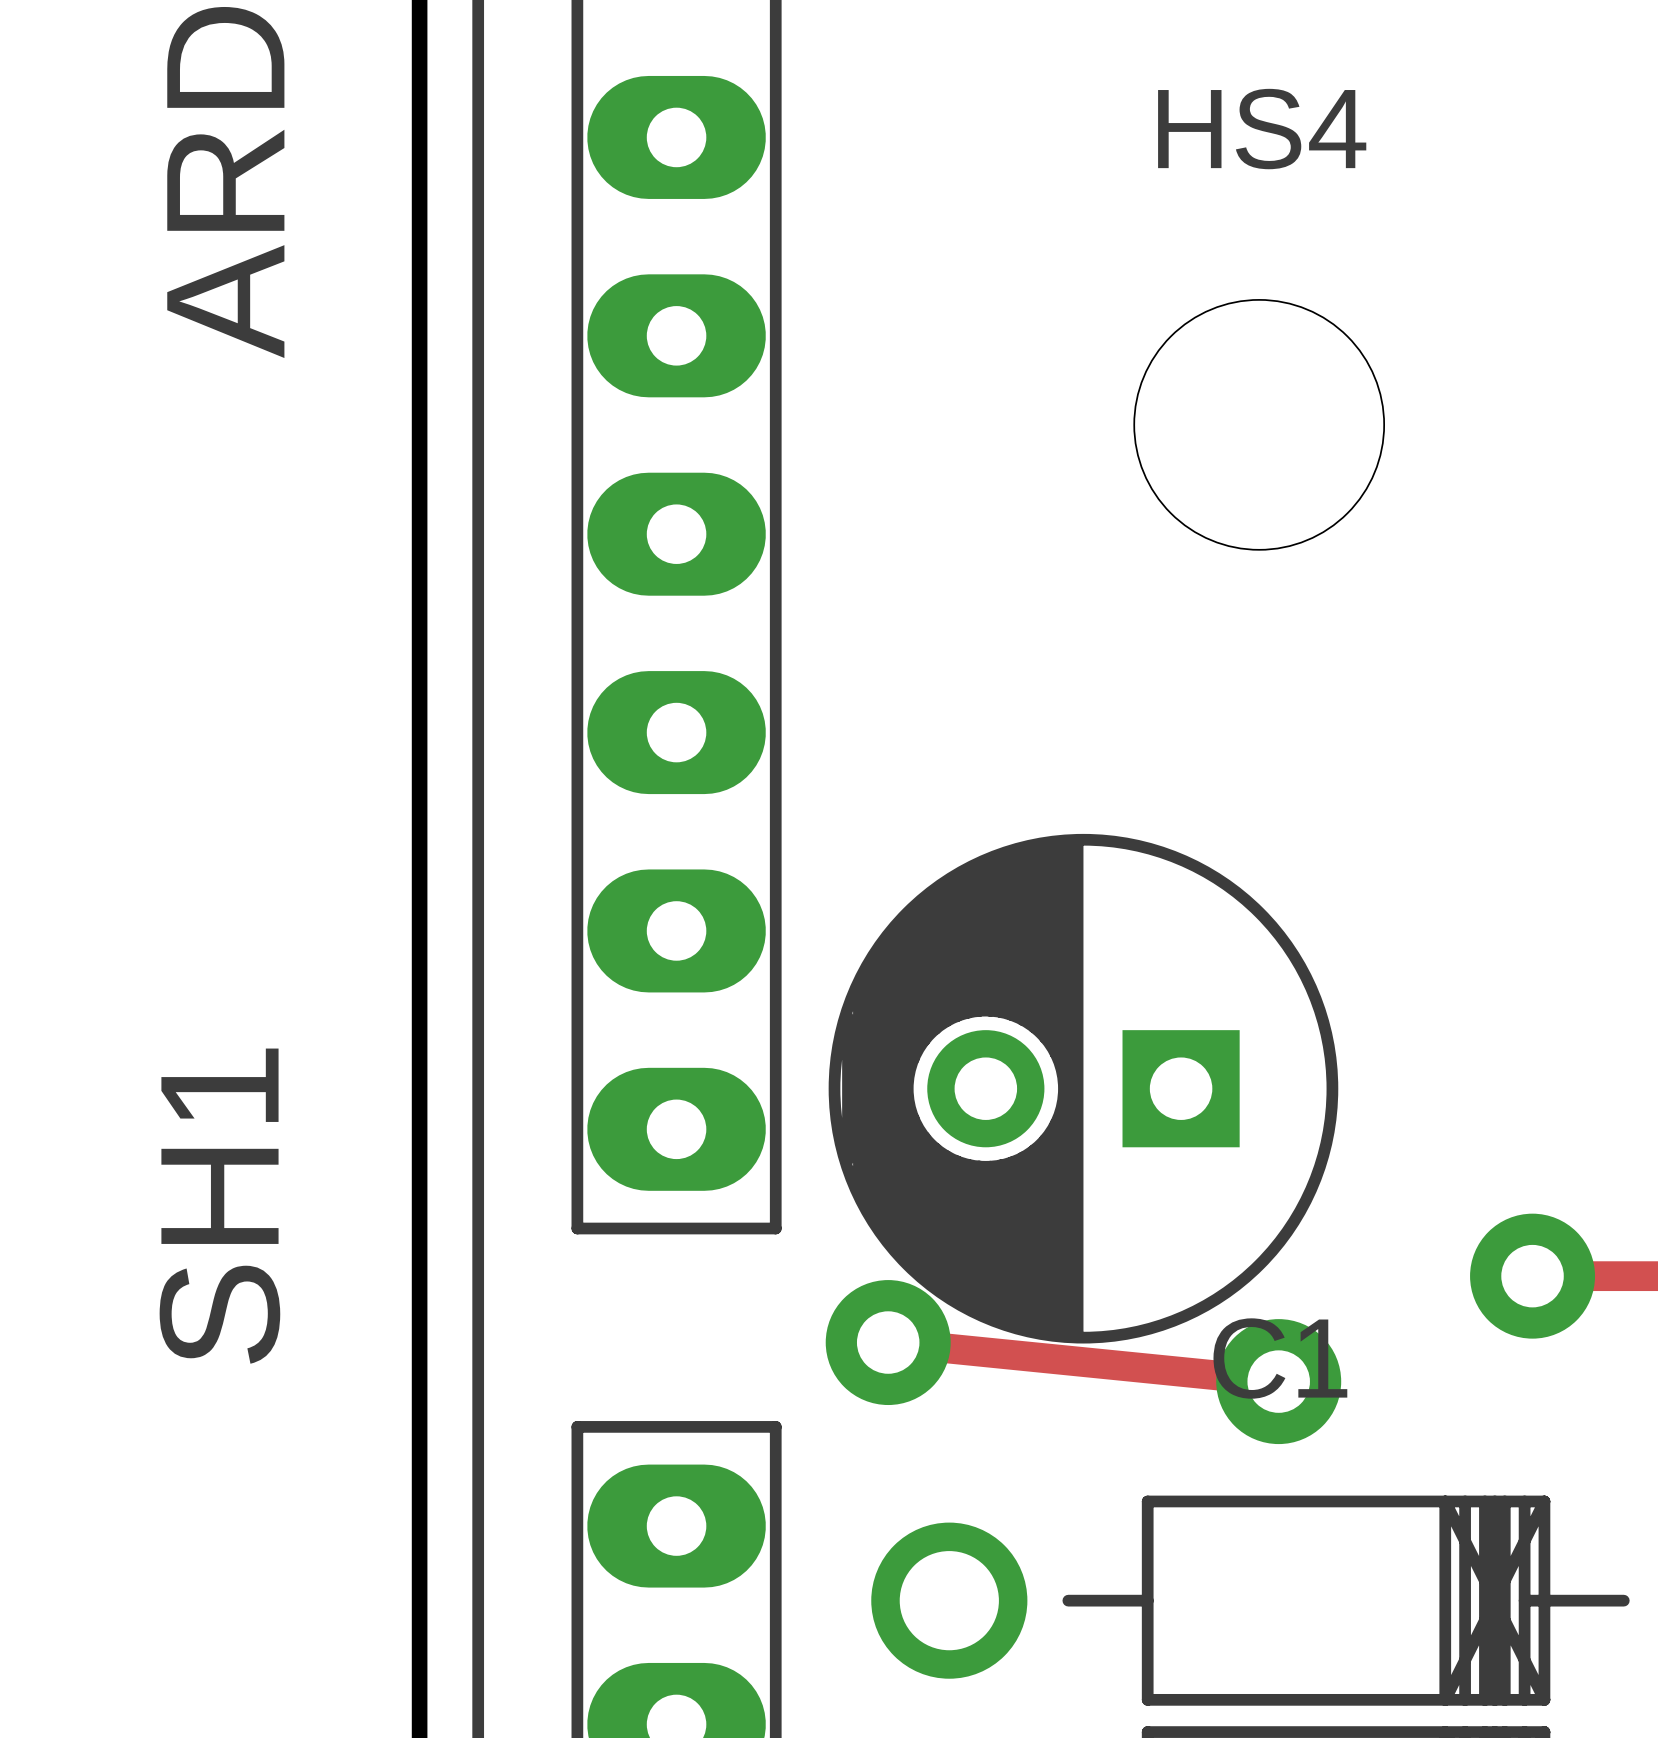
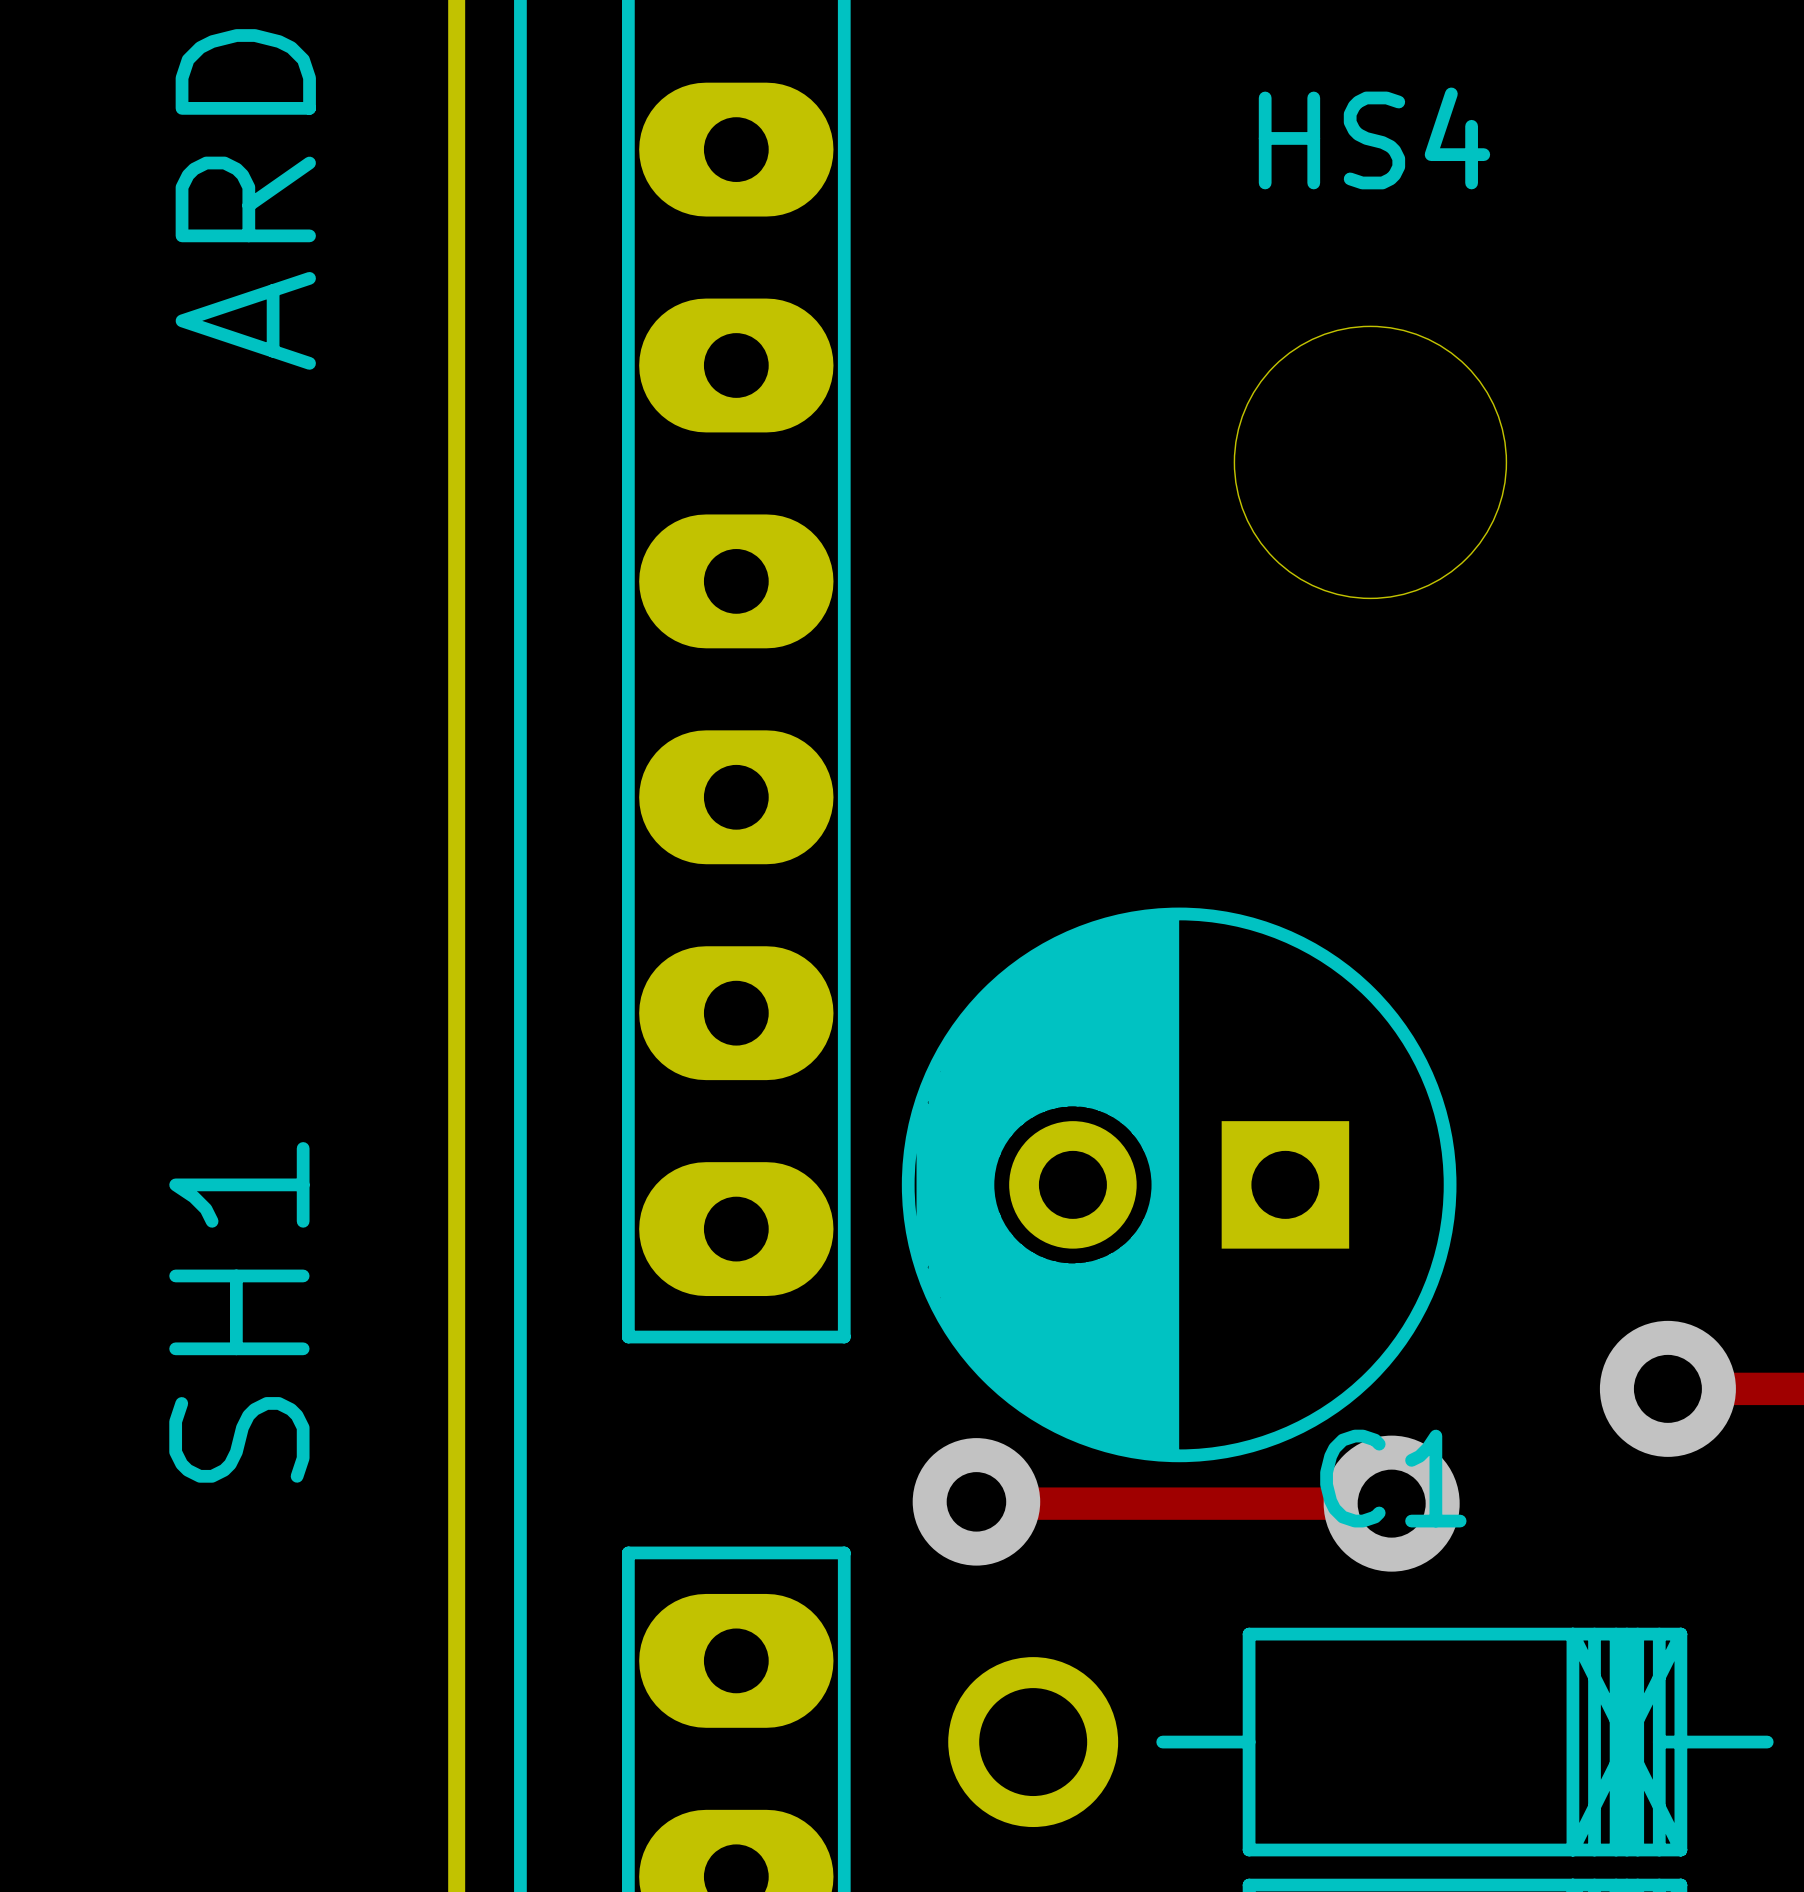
track: (888, 1342) (1278, 1381) -> (976, 1501) (978, 1503) (1391, 1503)
via position: (888, 1342) -> (976, 1501)

